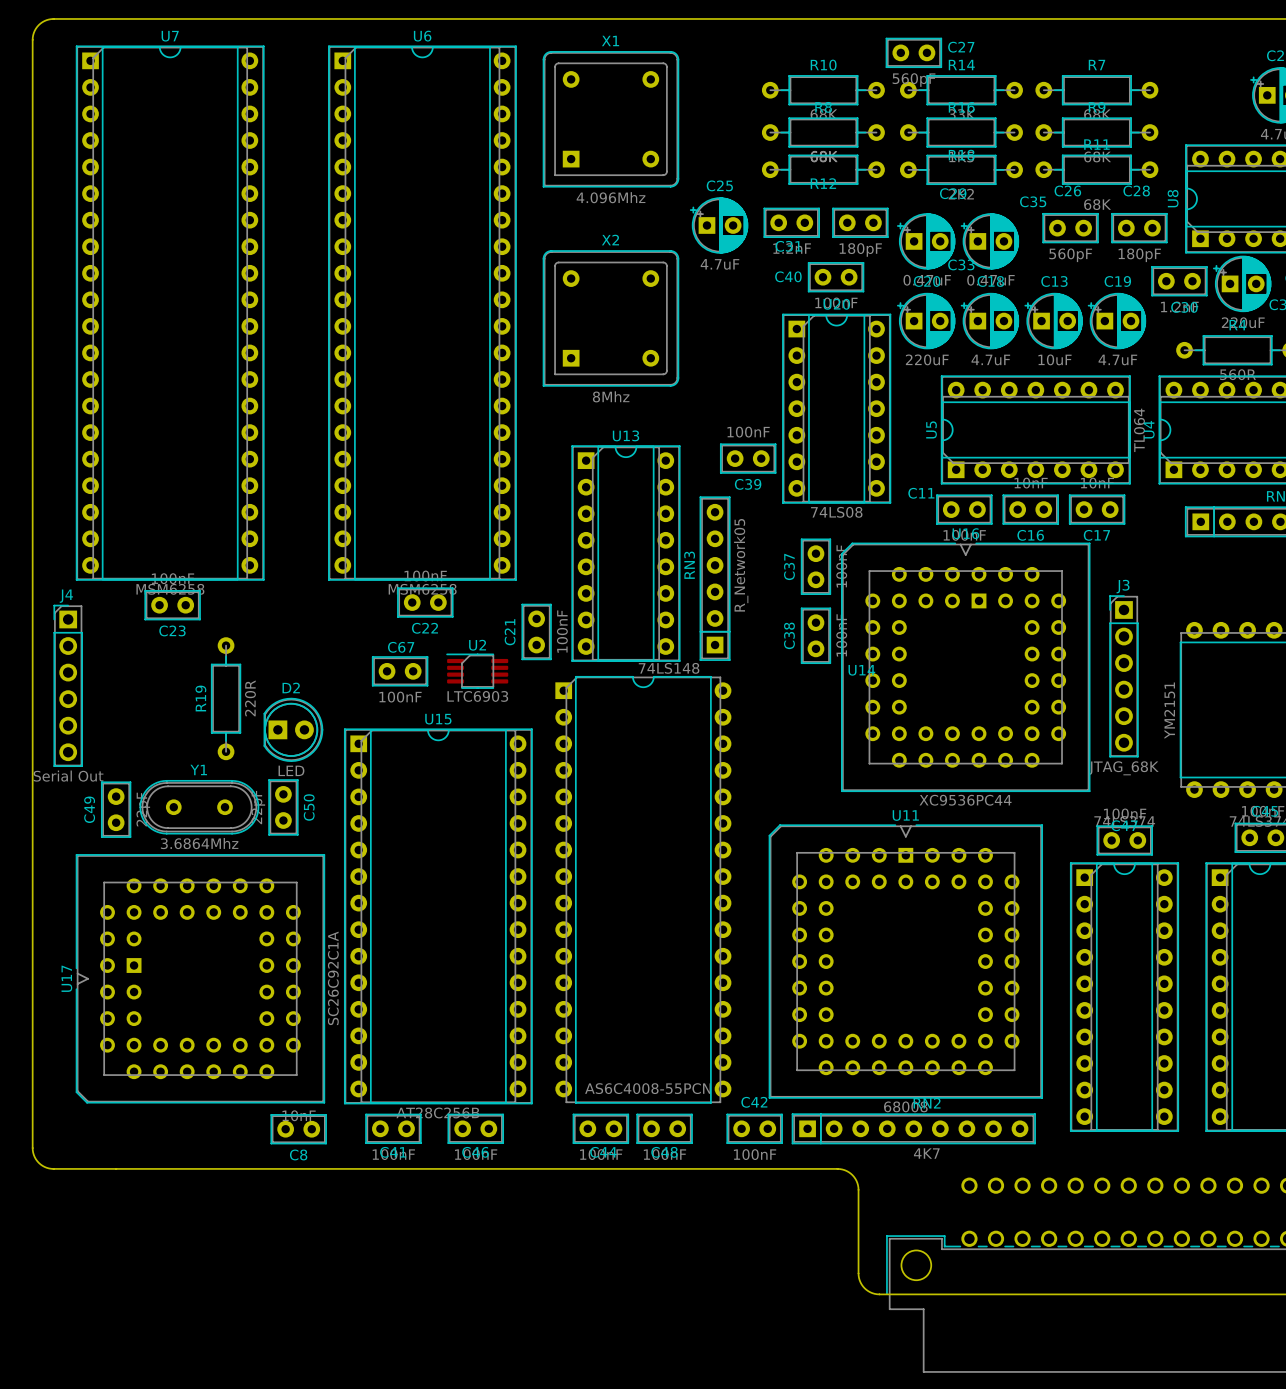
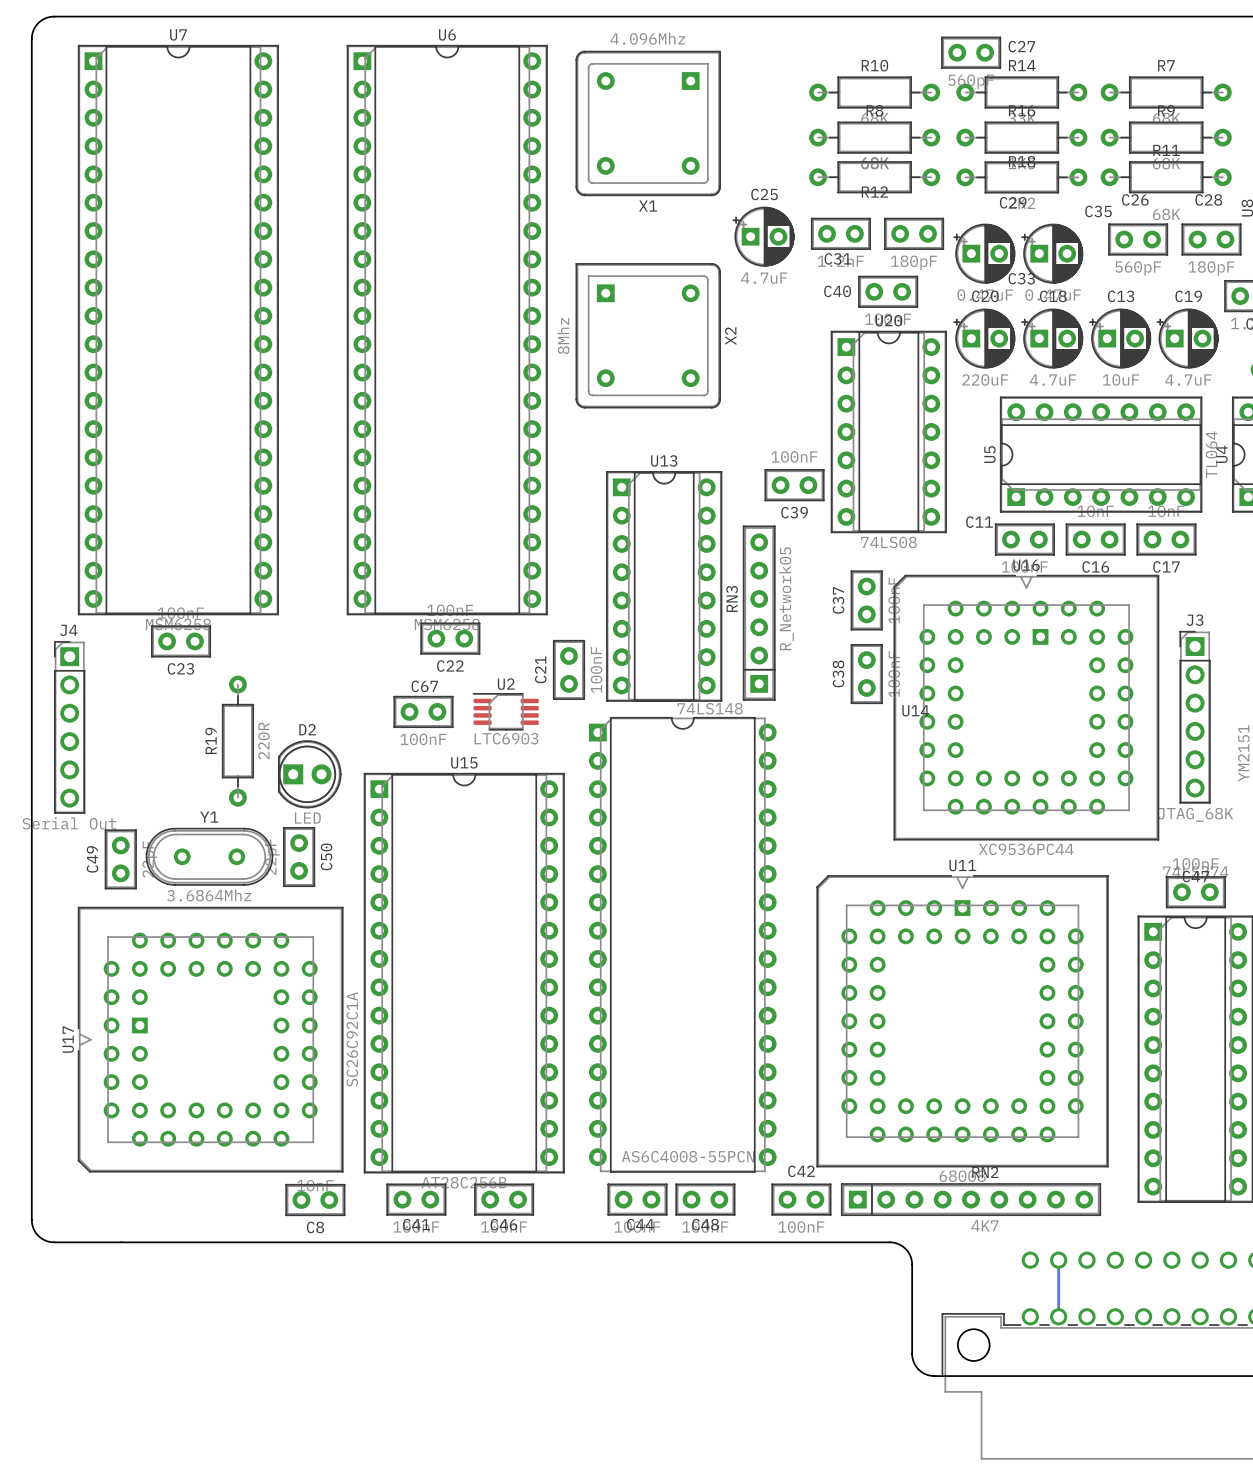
X1 rotation: 0° (610, 119) -> 180° (648, 123)
X2 rotation: 0° (610, 318) -> 90° clockwise (648, 335)
bottom track: none -> (1058, 1260) (1058, 1316)

